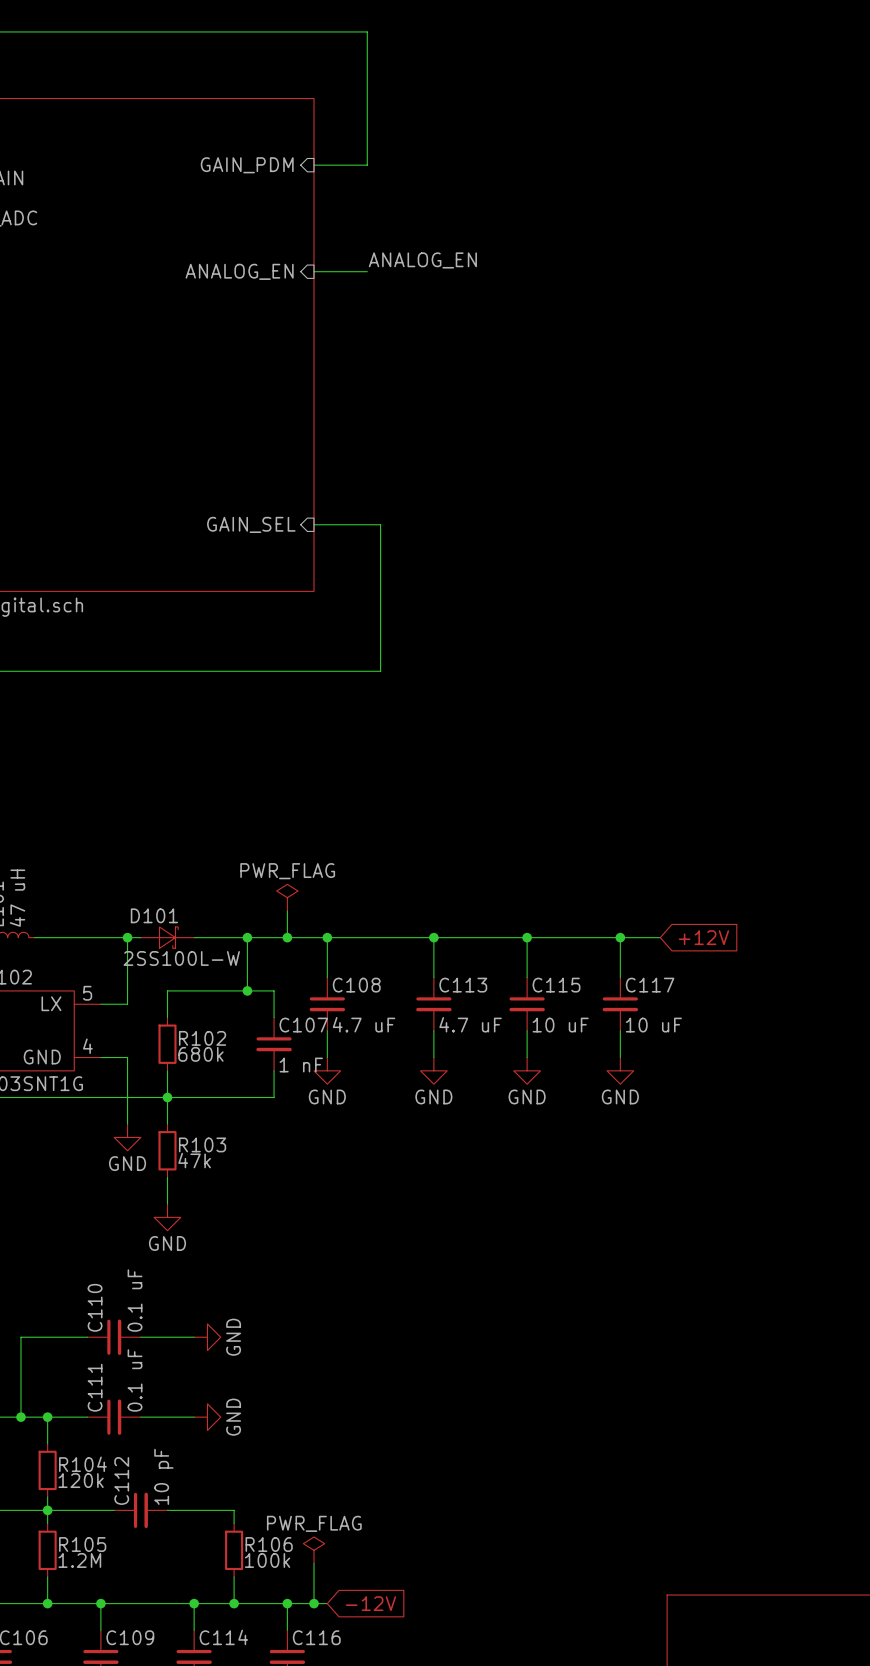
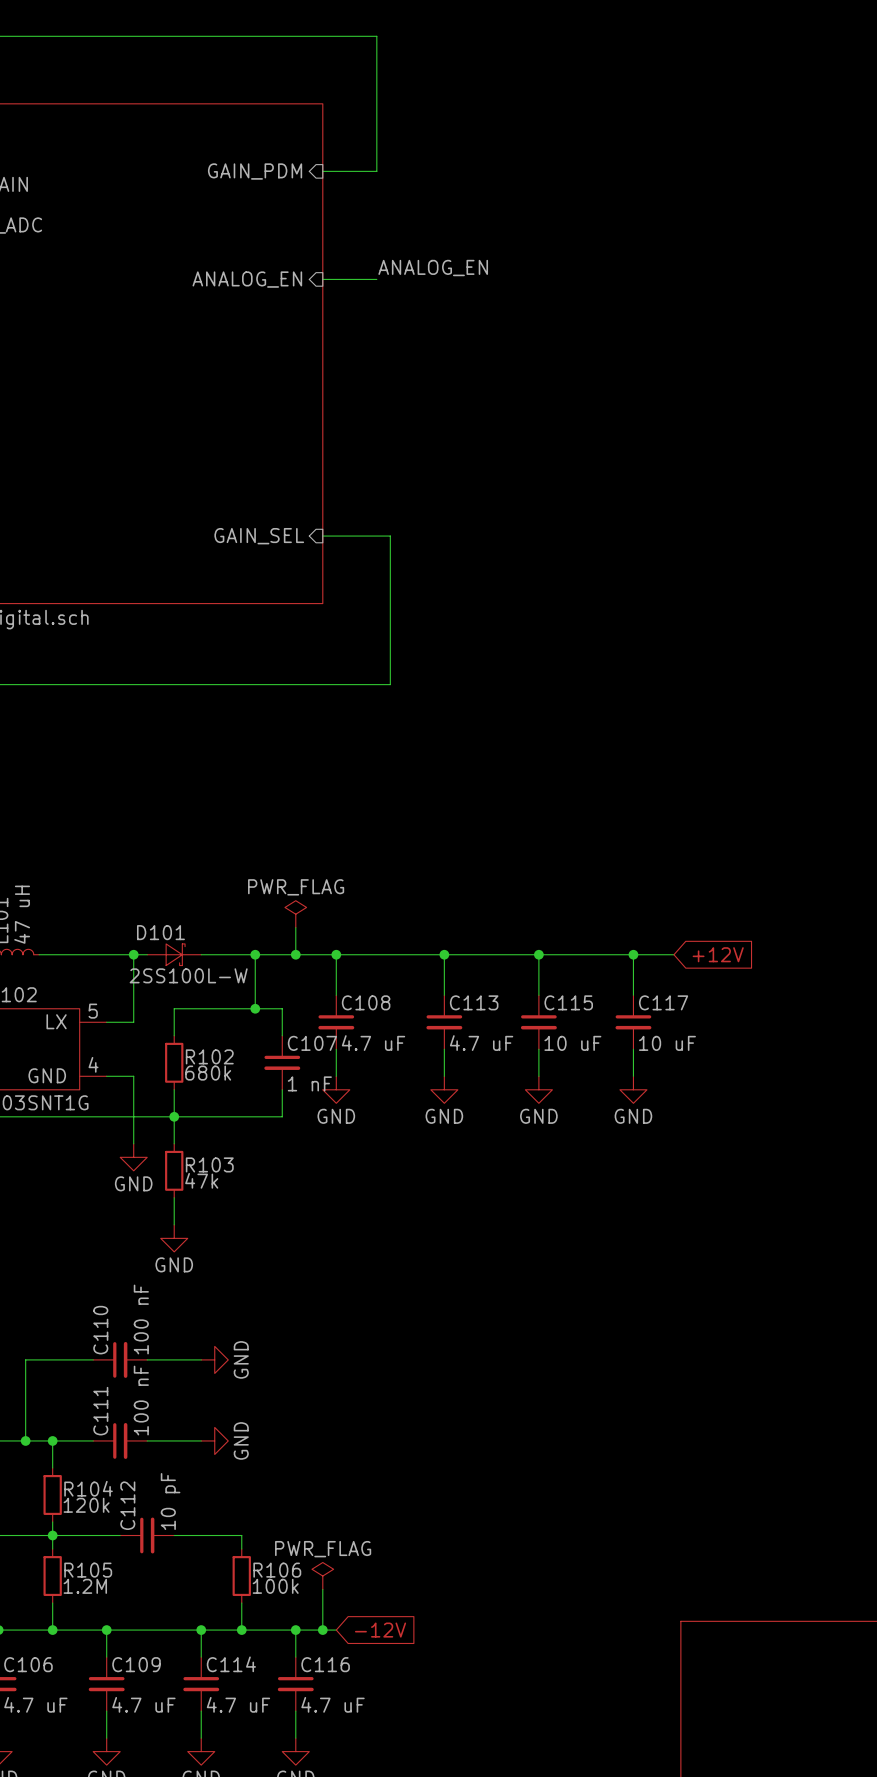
C110 value: 0.1 uF (135, 1300) -> 100 nF (141, 1319)
C111 value: 0.1 uF (135, 1380) -> 100 nF (141, 1400)

